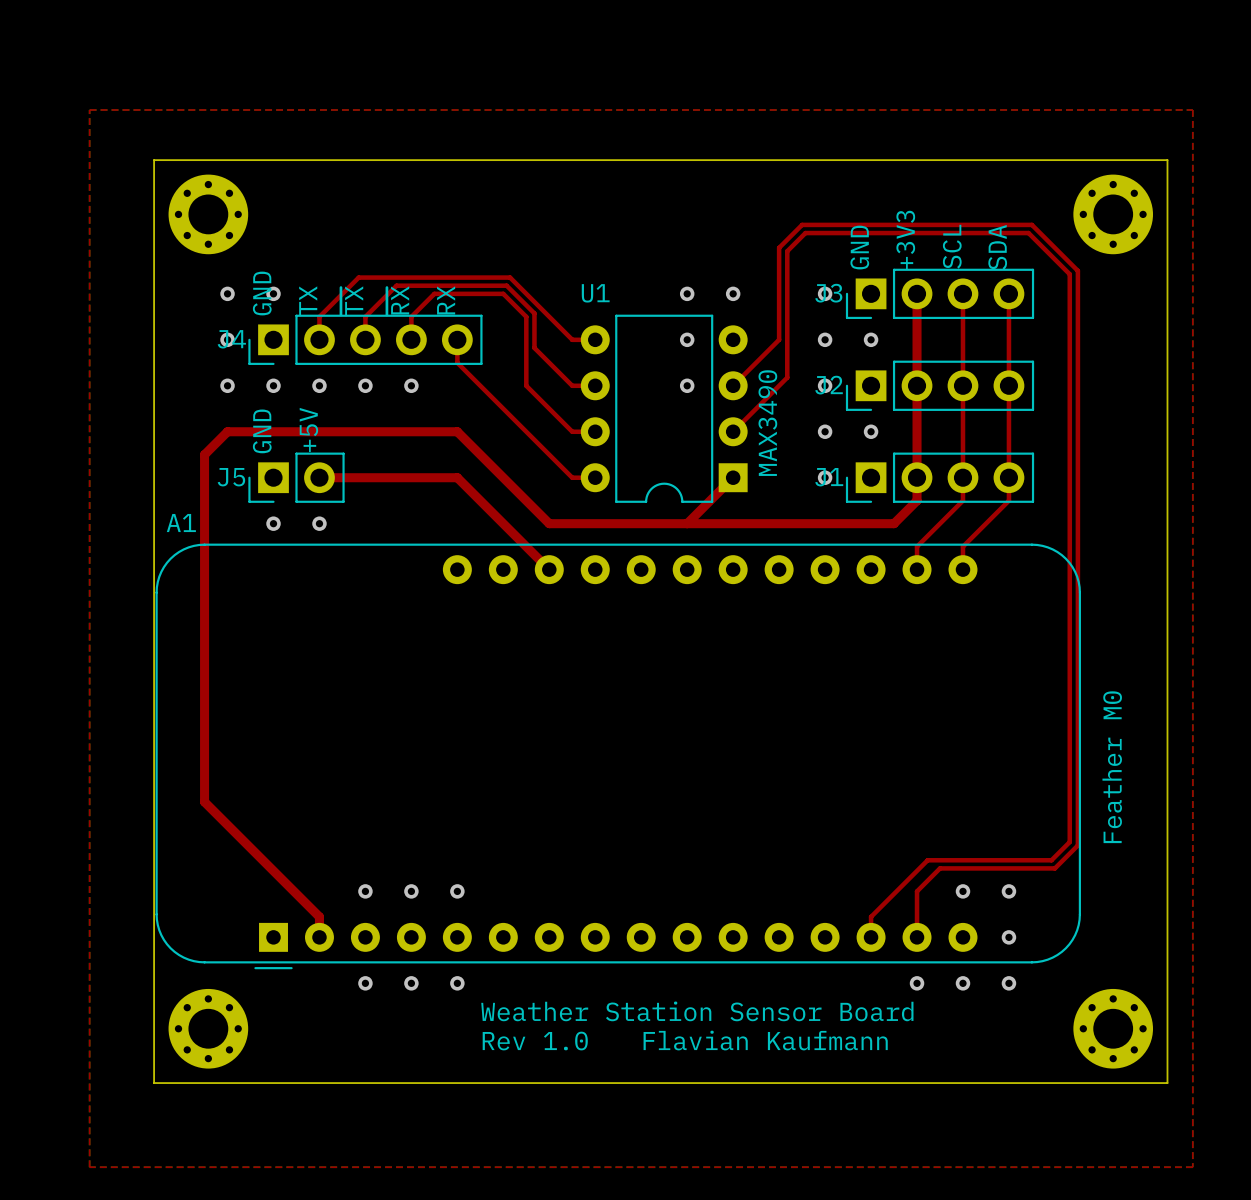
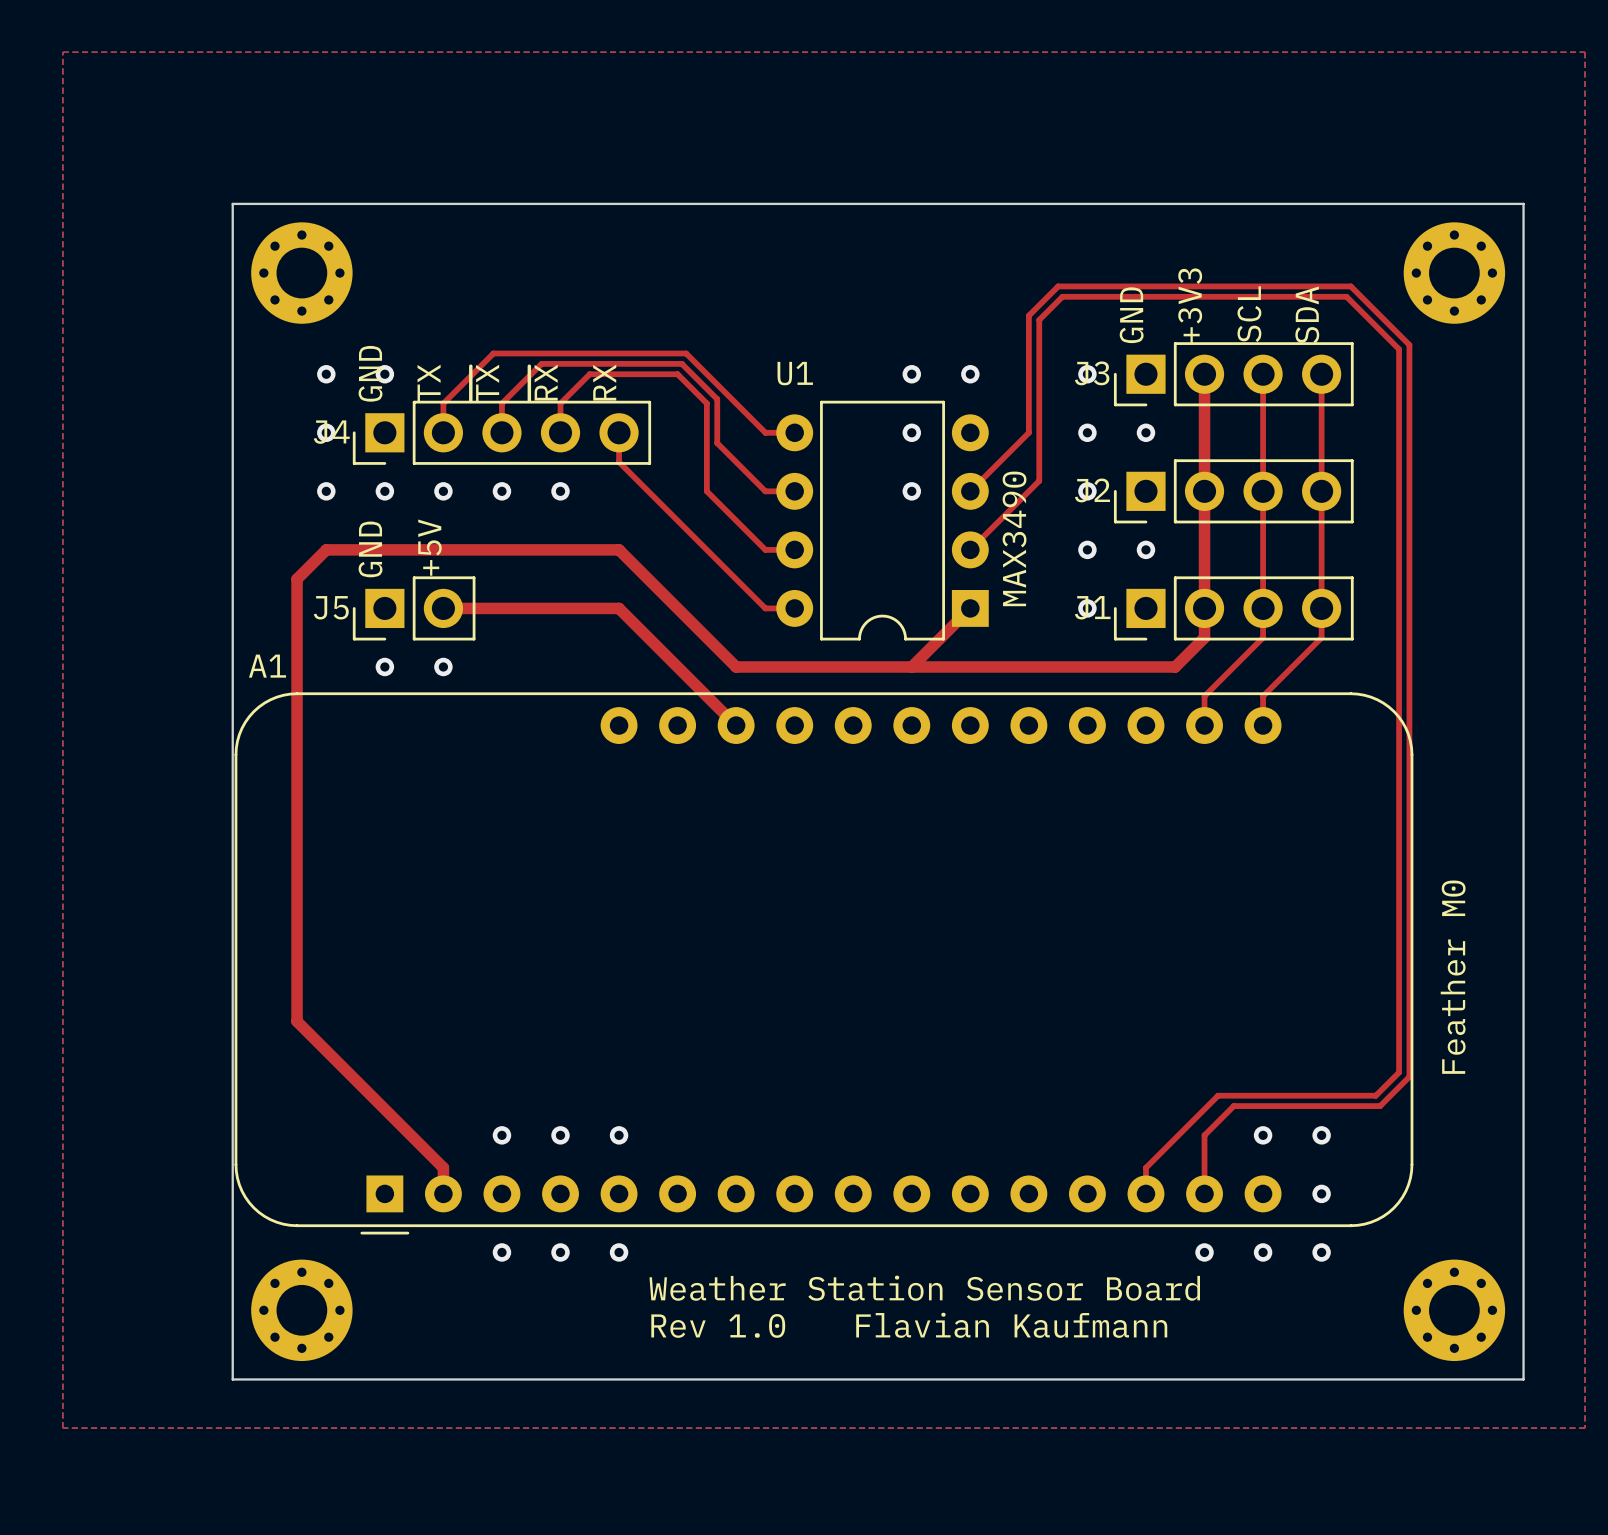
top zone outline: (89, 109) (1192, 109) (1192, 1167) (89, 1167) (89, 109) -> (62, 52) (62, 1428) (1585, 1428) (1585, 52) (62, 52)

